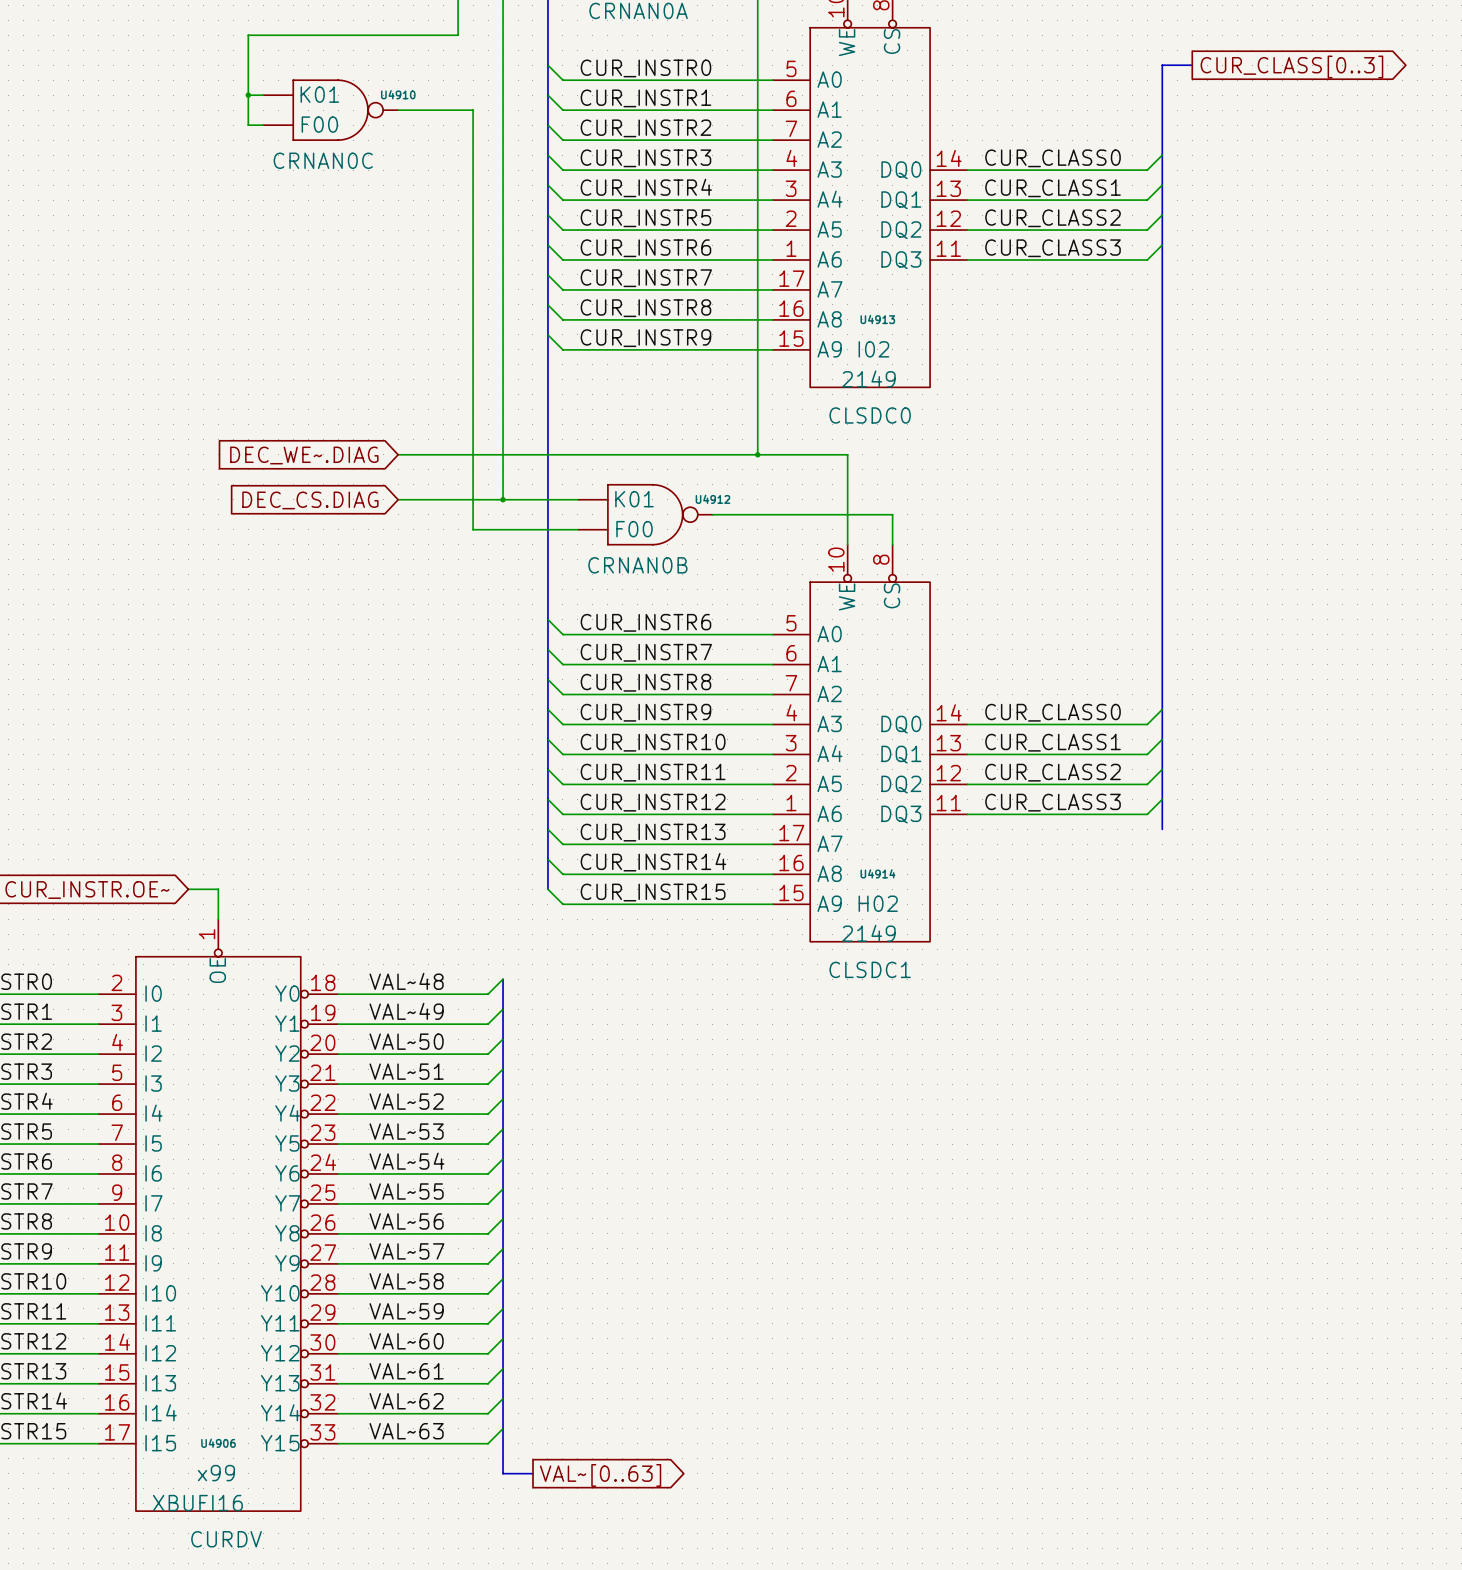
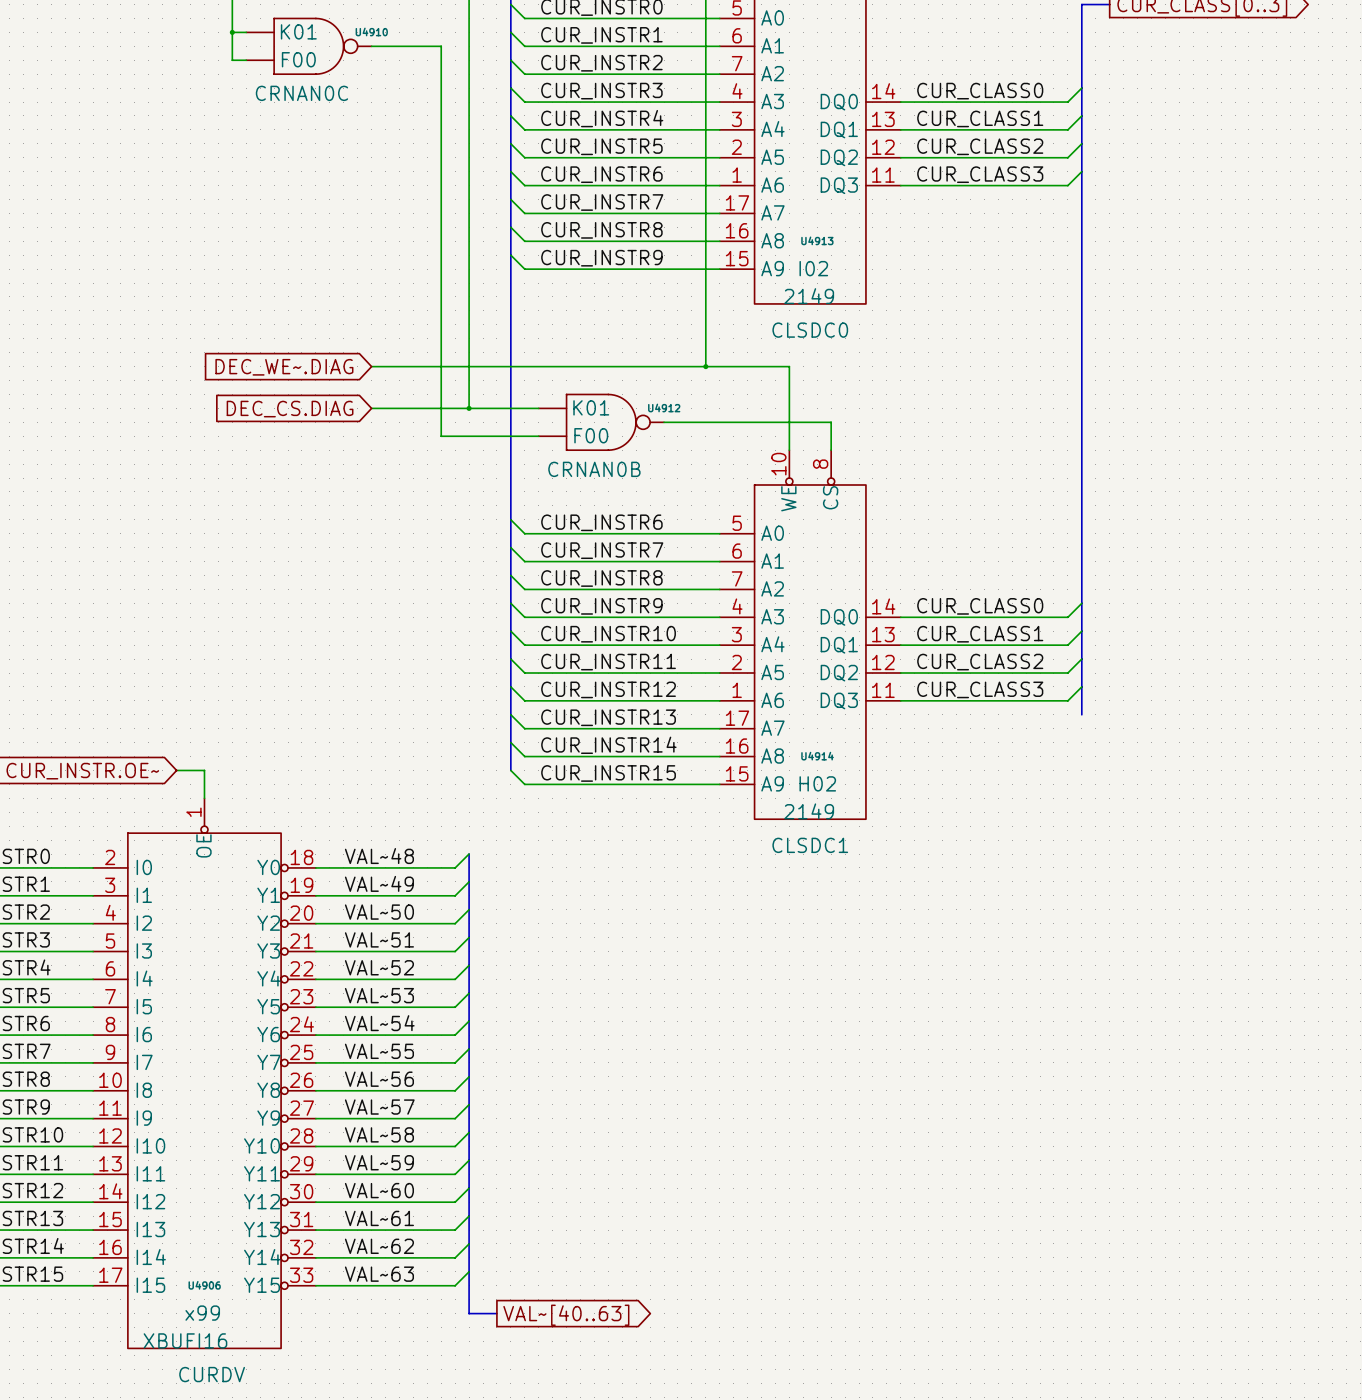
global label: VAL~[0..63] (600, 1475) -> VAL~[40..63] (566, 1315)

